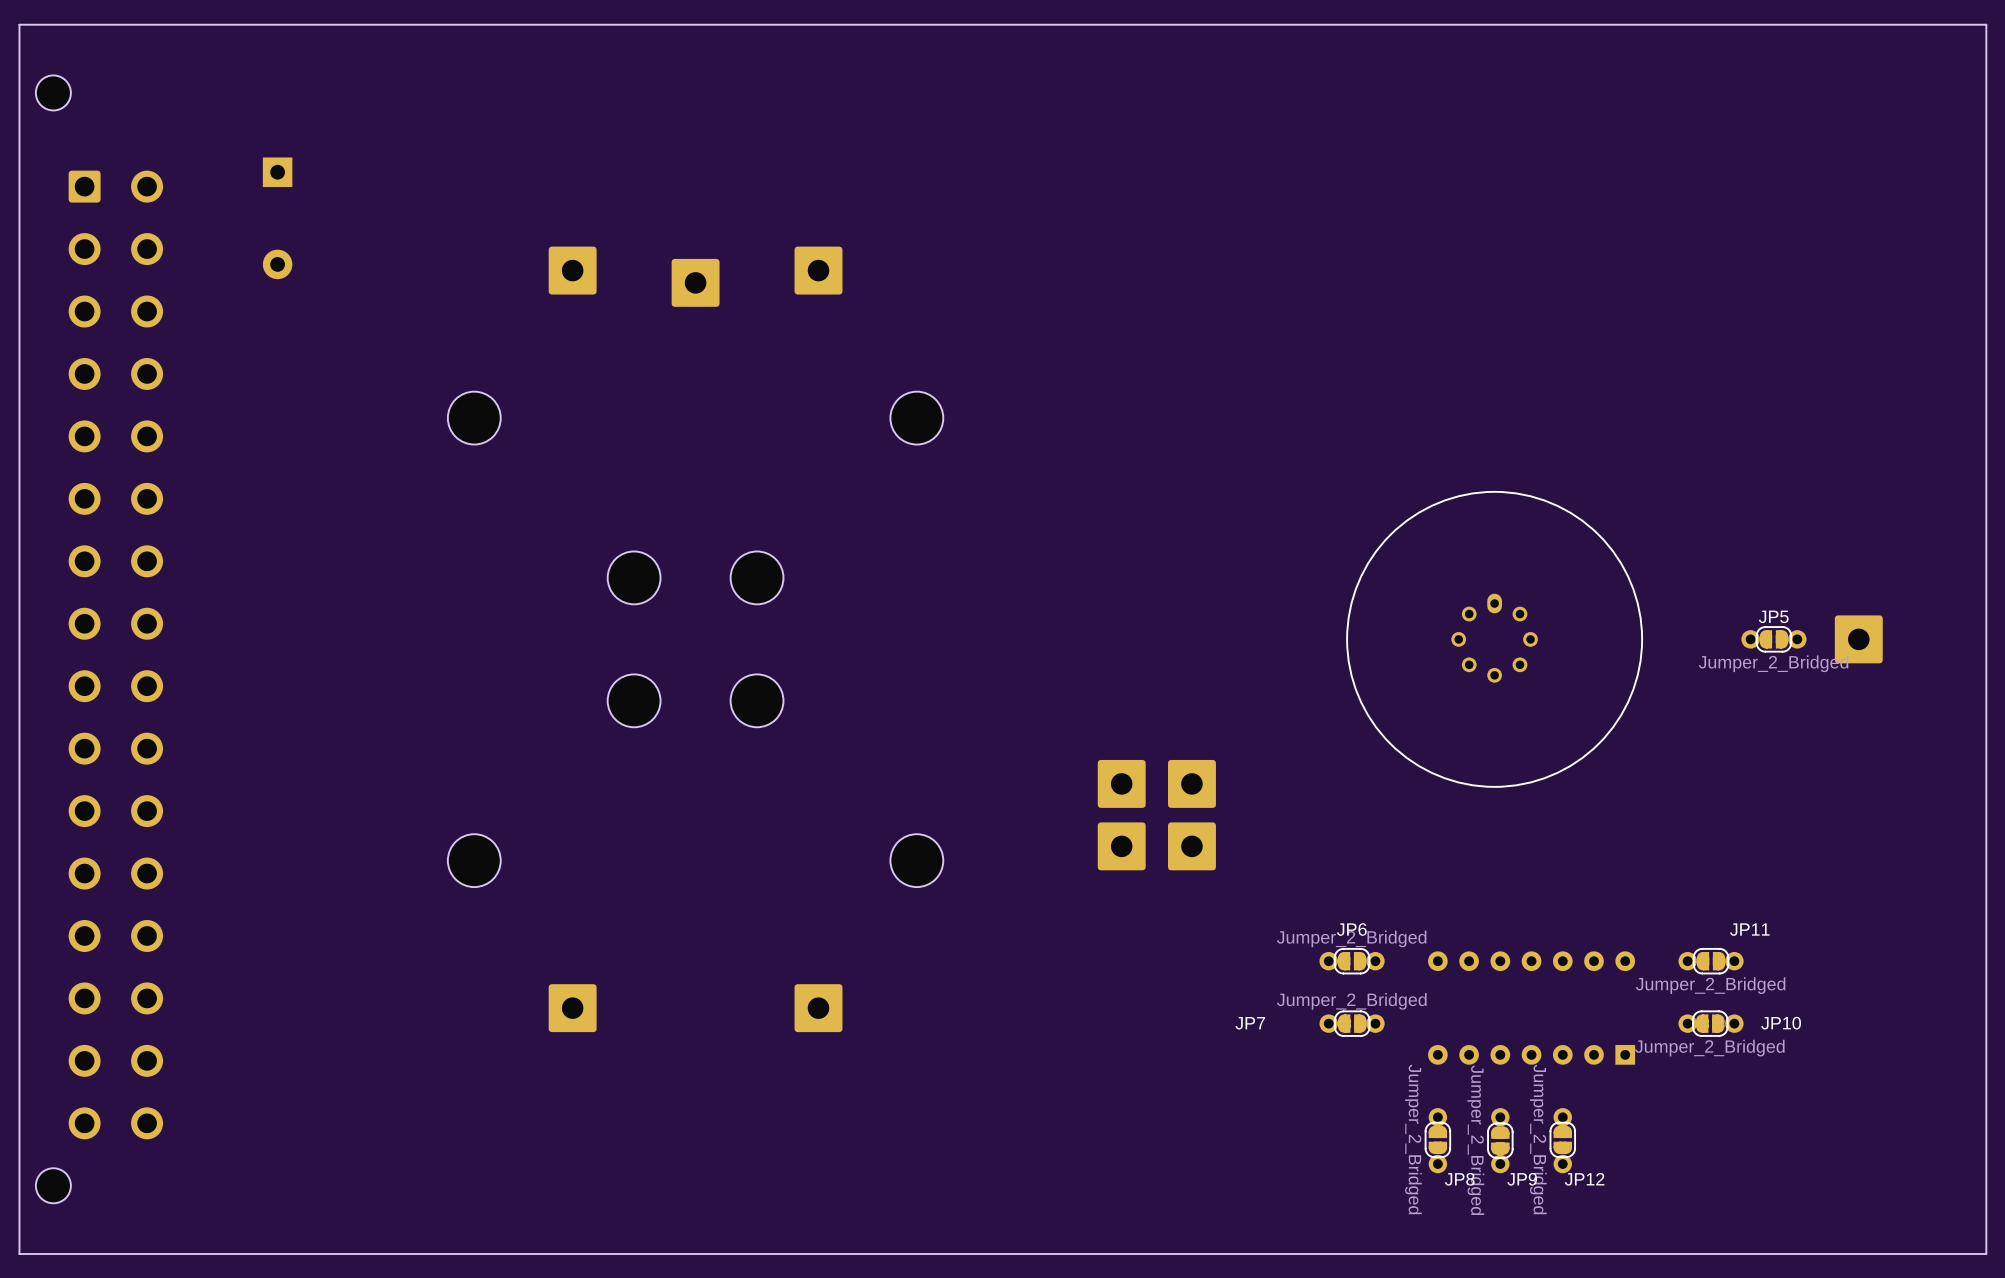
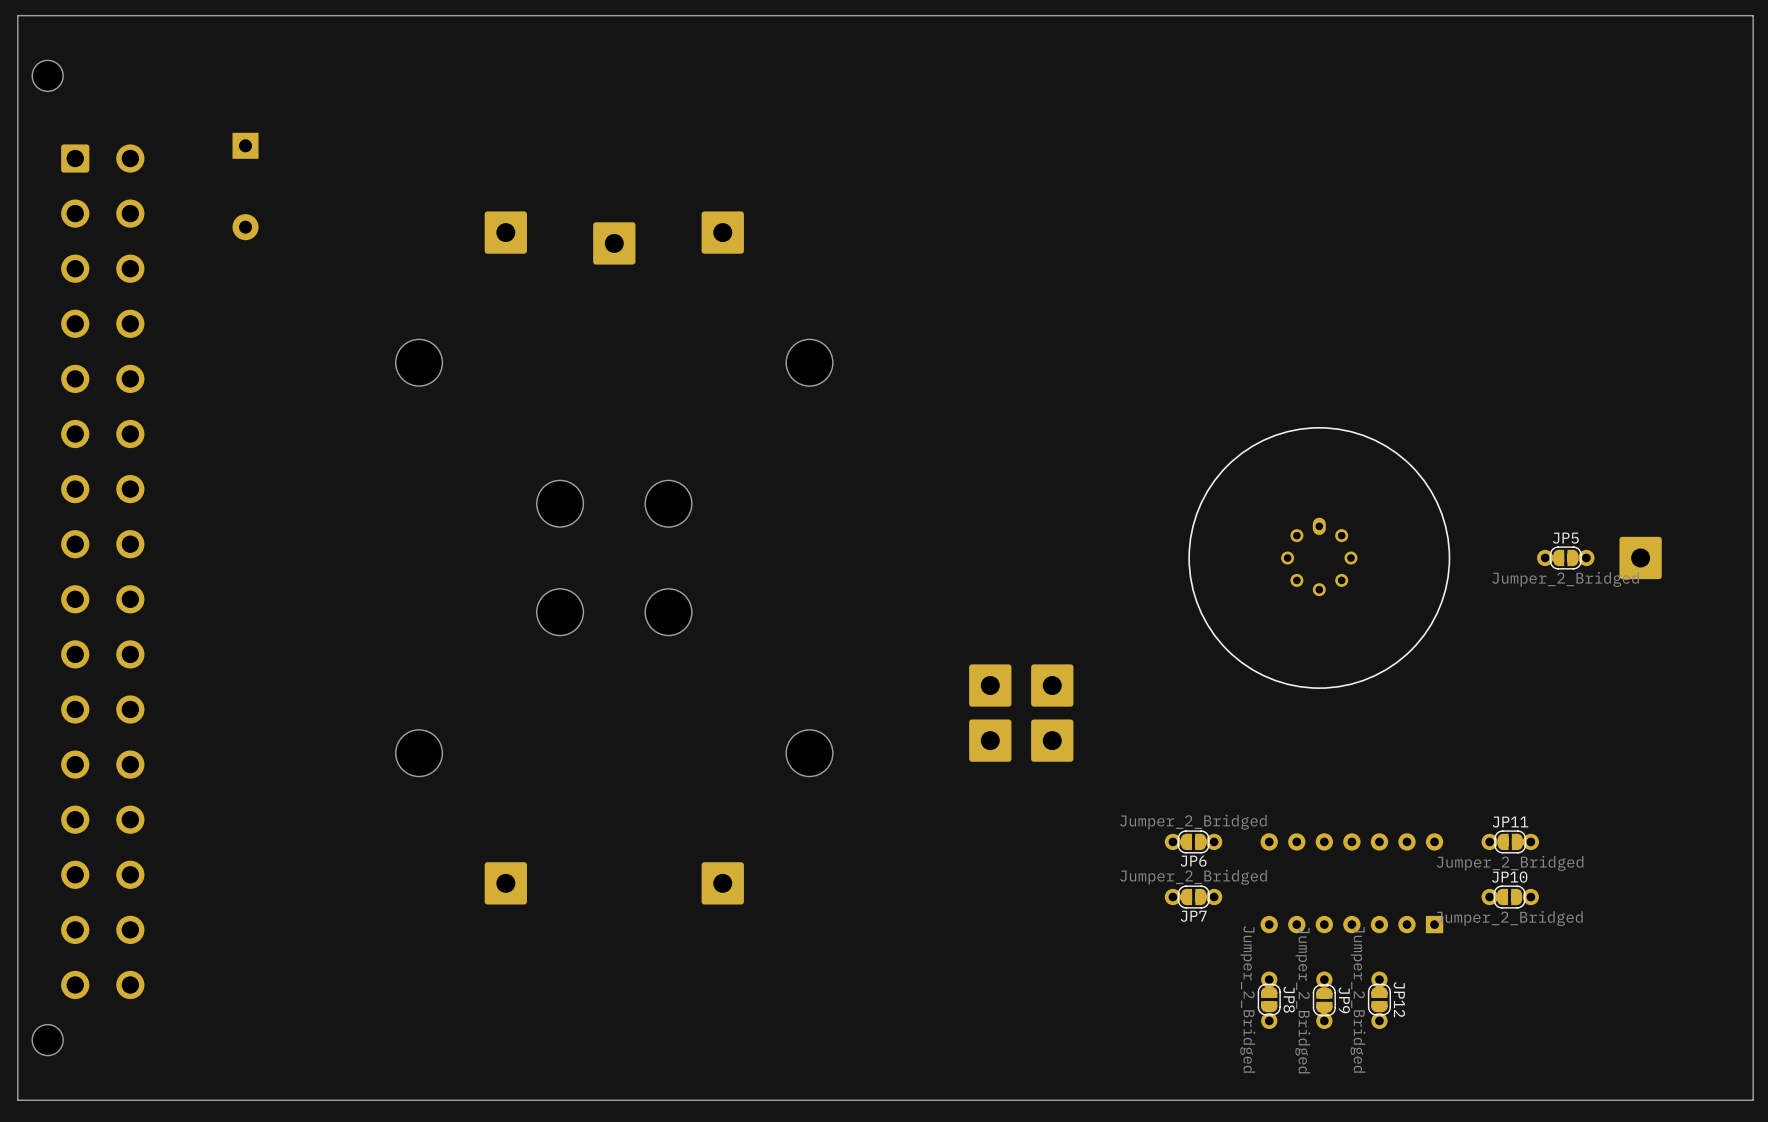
JP6 name position: JP6 (1351, 929) -> JP6 (1193, 861)
JP11 name position: JP11 (1749, 929) -> JP11 (1510, 822)
JP7 name position: JP7 (1250, 1023) -> JP7 (1193, 916)
JP10 name position: JP10 (1781, 1023) -> JP10 (1509, 877)
JP8 name rotation: 0° (1459, 1179) -> 90° clockwise (1289, 999)
JP9 name rotation: 0° (1522, 1179) -> 90° clockwise (1344, 1000)
JP12 name rotation: 0° (1584, 1179) -> 90° clockwise (1399, 999)

